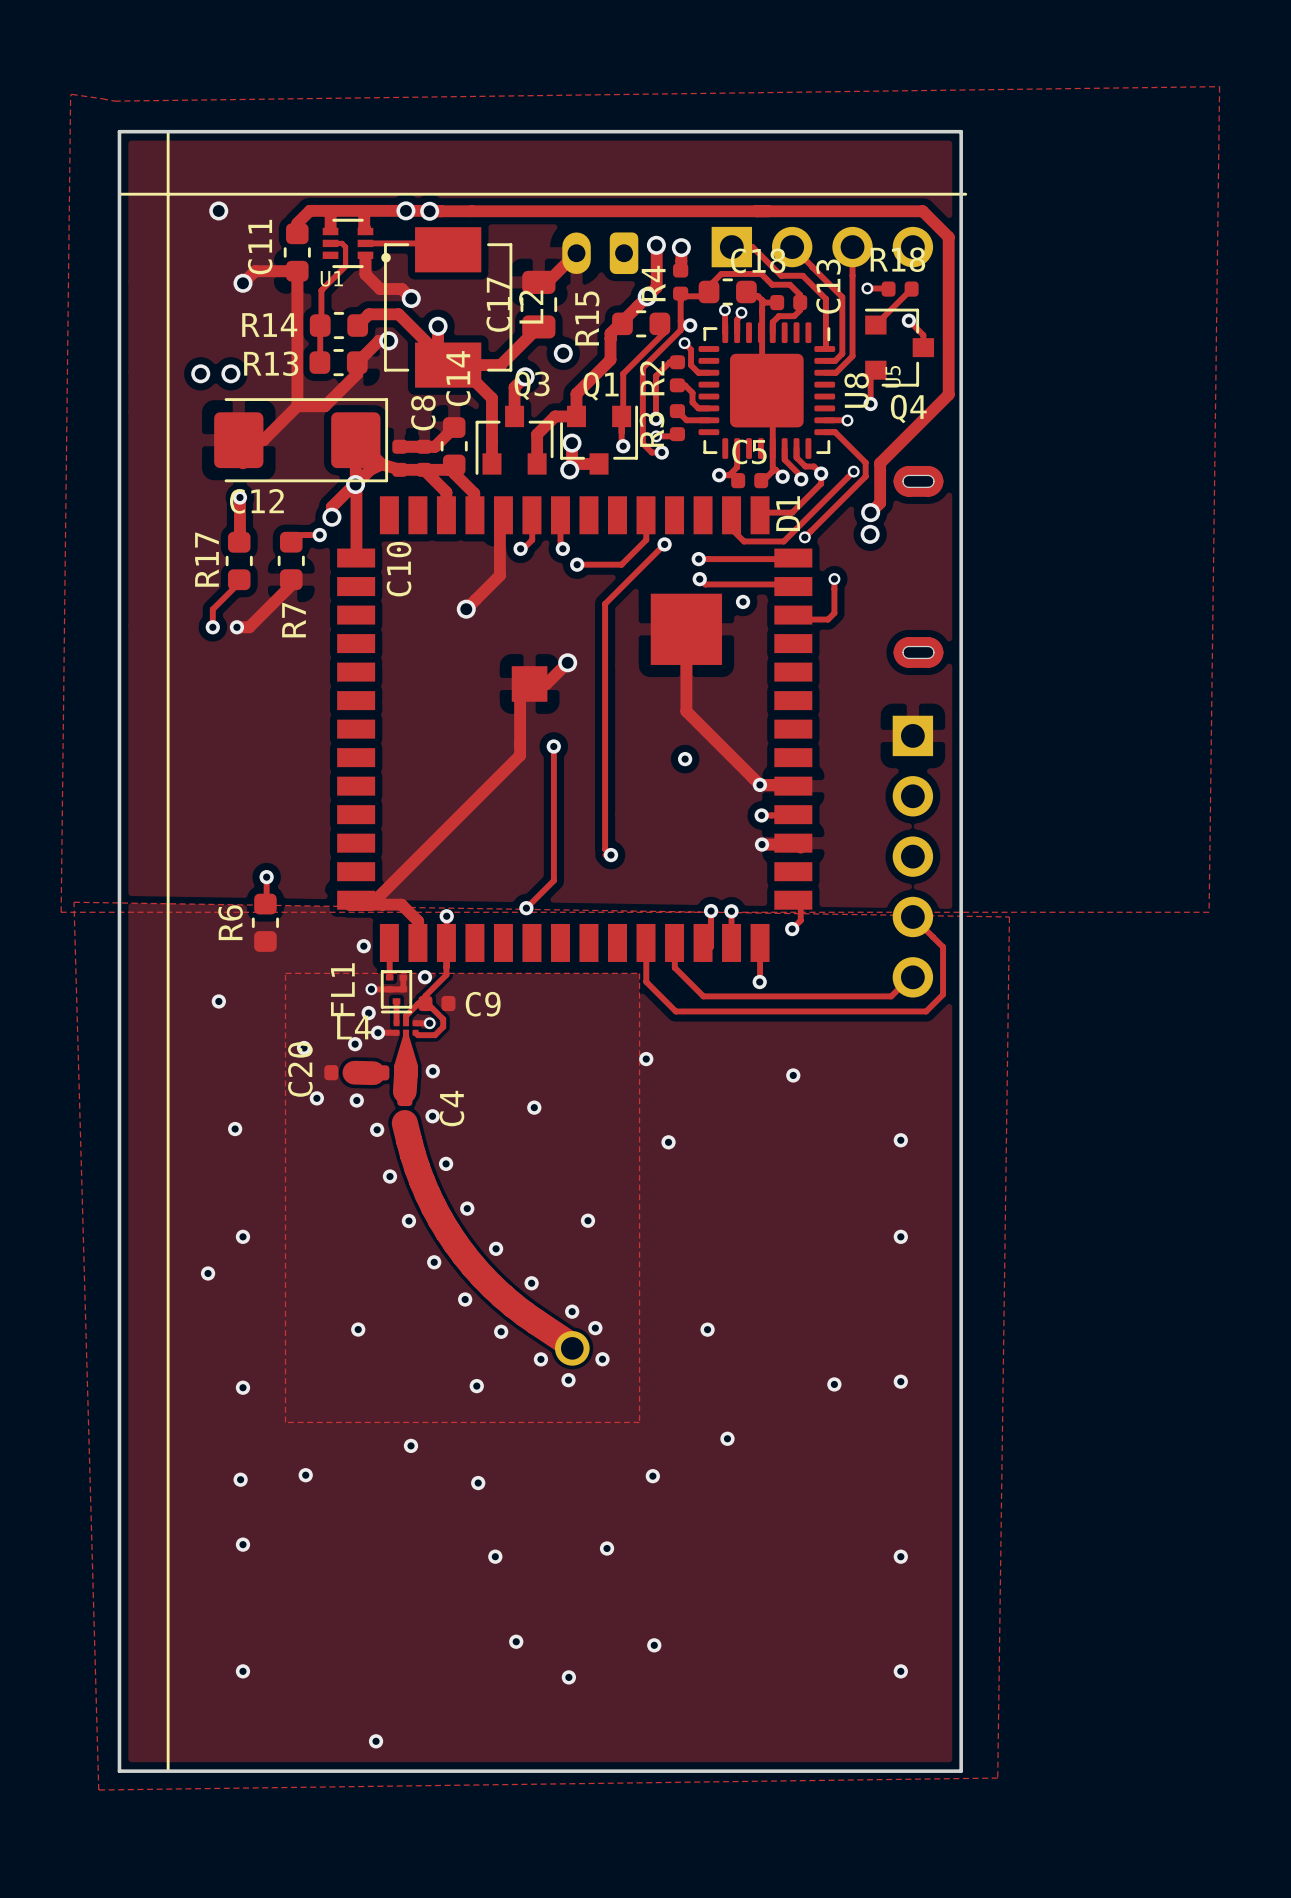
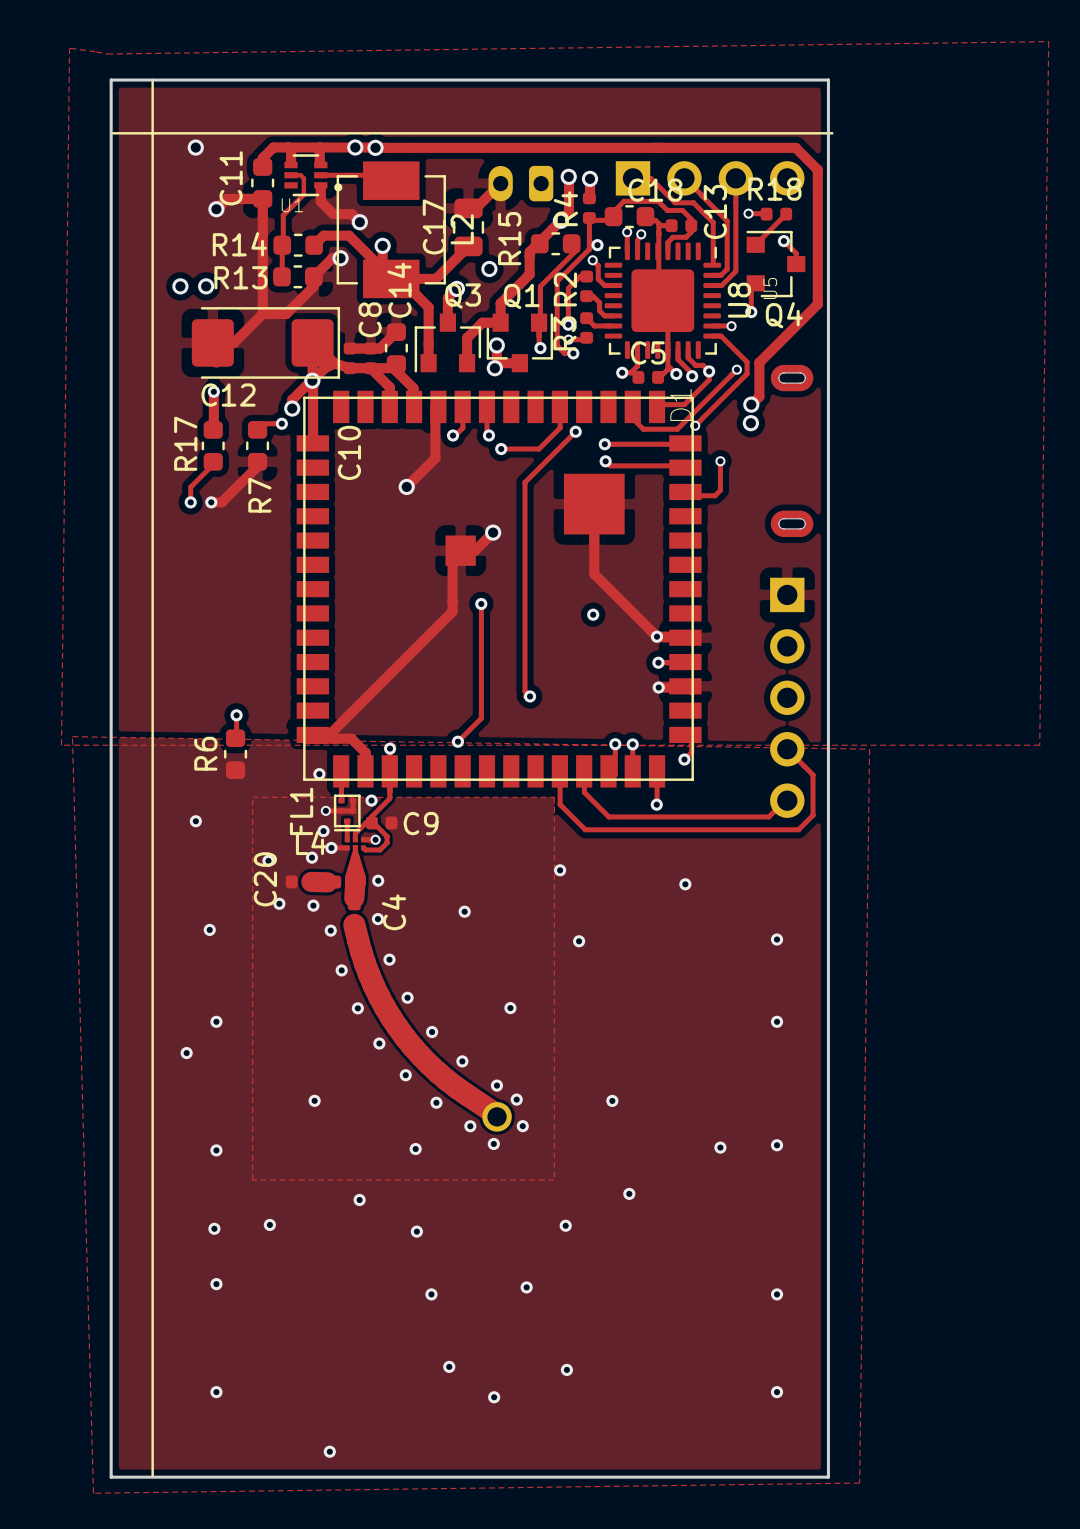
D1 footprint: [337, 496, 813, 962] -> [296, 390, 702, 788]
via: (743, 601) -> none

